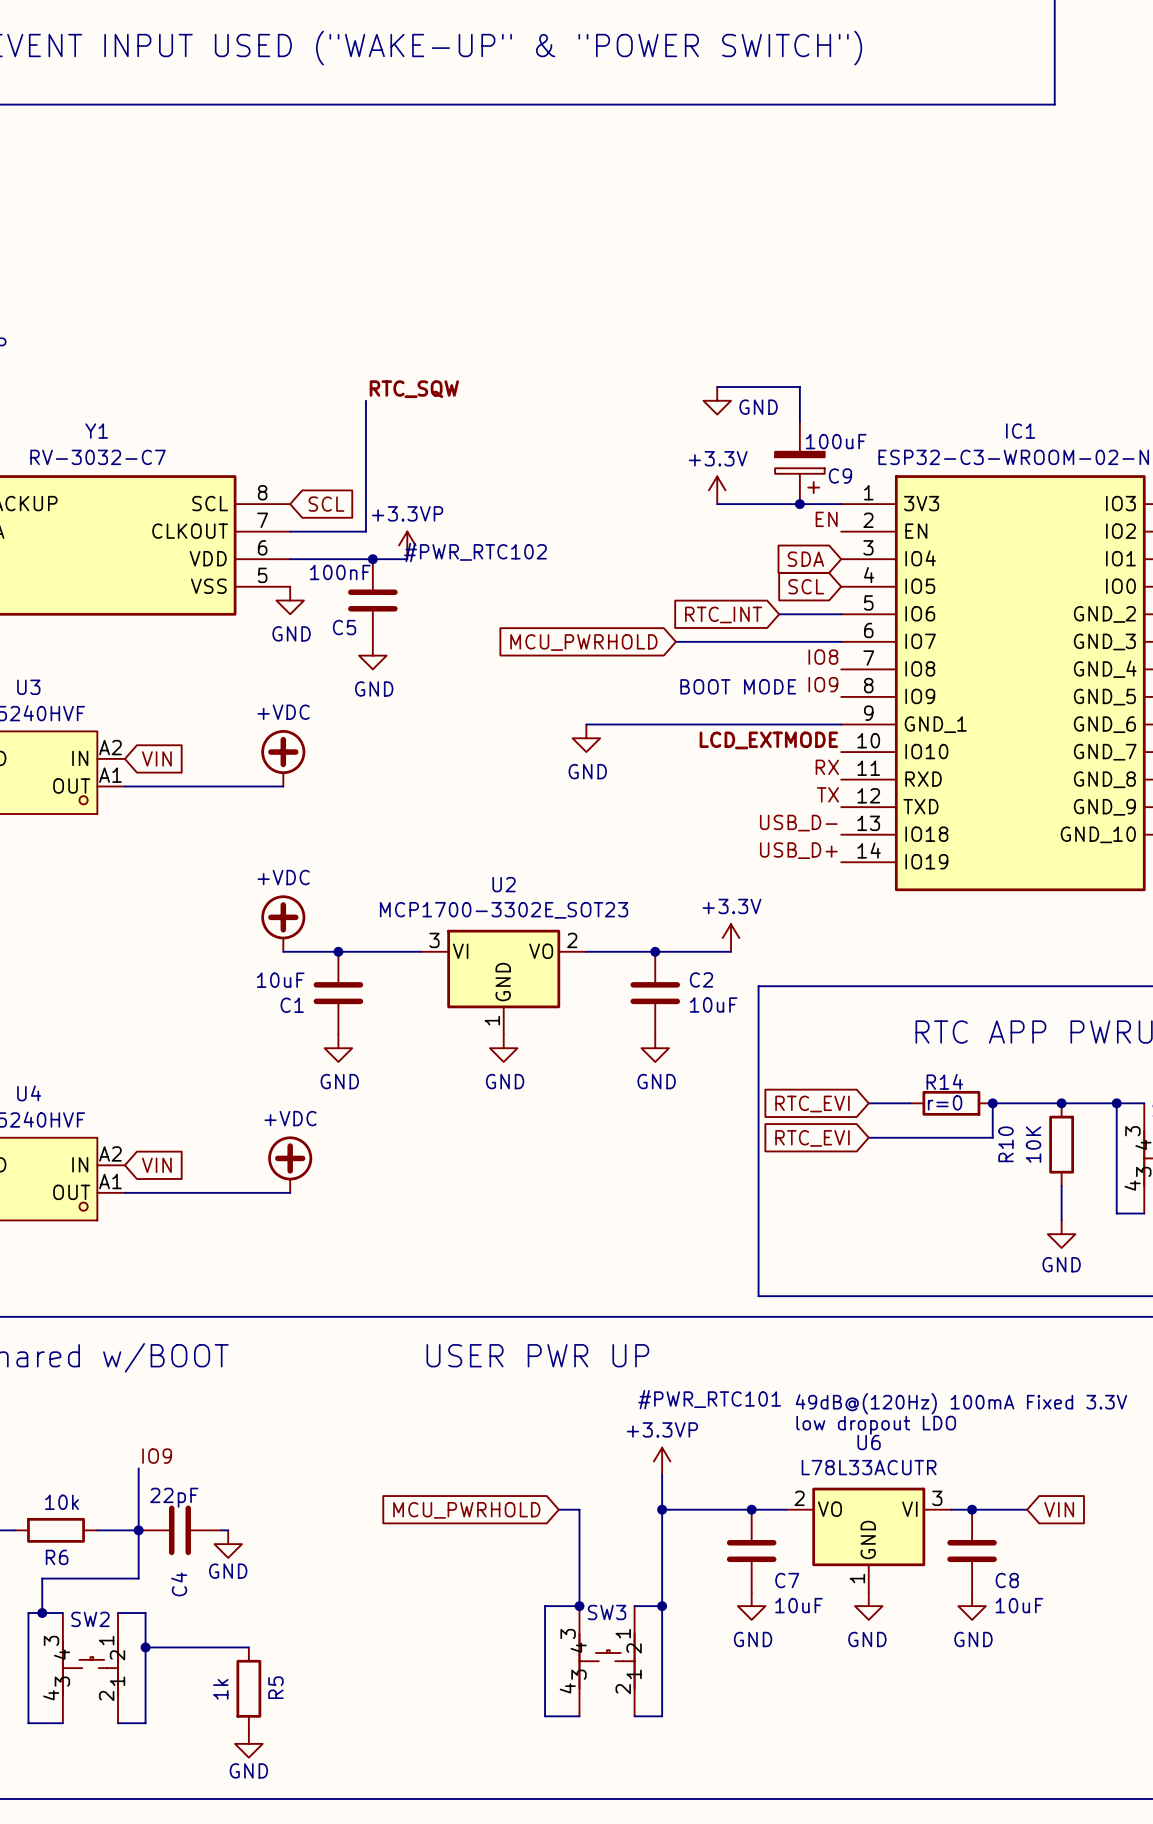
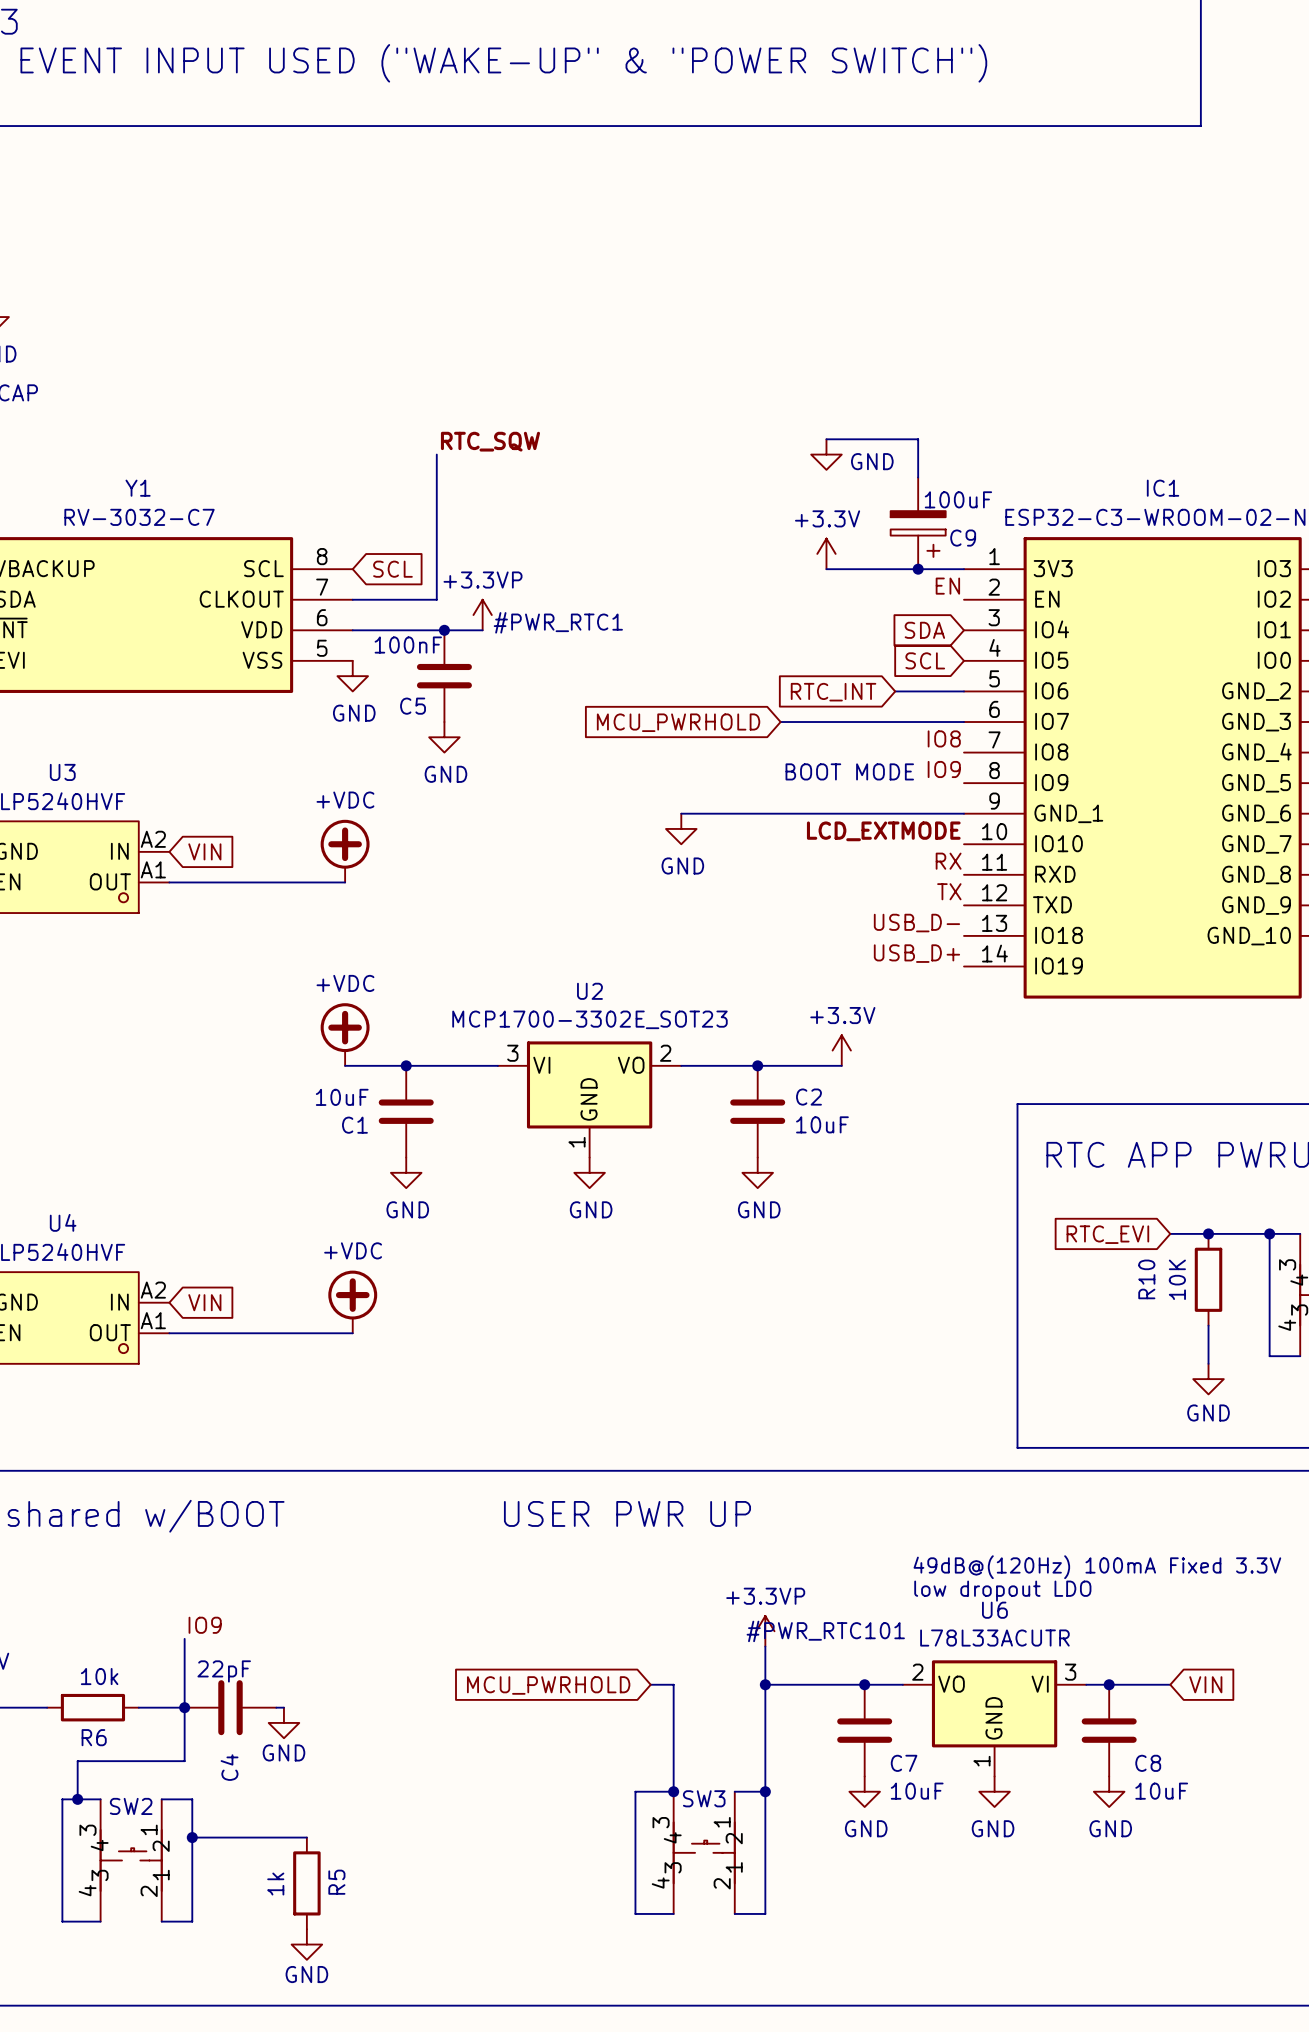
#PWR_RTC102 name: #PWR_RTC102 (475, 552) -> #PWR_RTC1 (558, 622)
line: (889, 986) (758, 986) (758, 1296) (889, 1296) -> (1017, 1104) (1017, 1447)
global label: RTC_EVI (812, 1103) -> none
wire: (868, 1103) (910, 1103) -> none
R14: r=0 (951, 1103) -> none
global label: none -> RTC_EVI (1107, 1234)
junction: (992, 1103) -> none
wire: (1027, 1103) (992, 1103) (992, 1137) (868, 1137) -> none
global label: RTC_EVI (812, 1138) -> none
#PWR_RTC101 name position: #PWR_RTC101 (709, 1399) -> #PWR_RTC101 (825, 1631)

